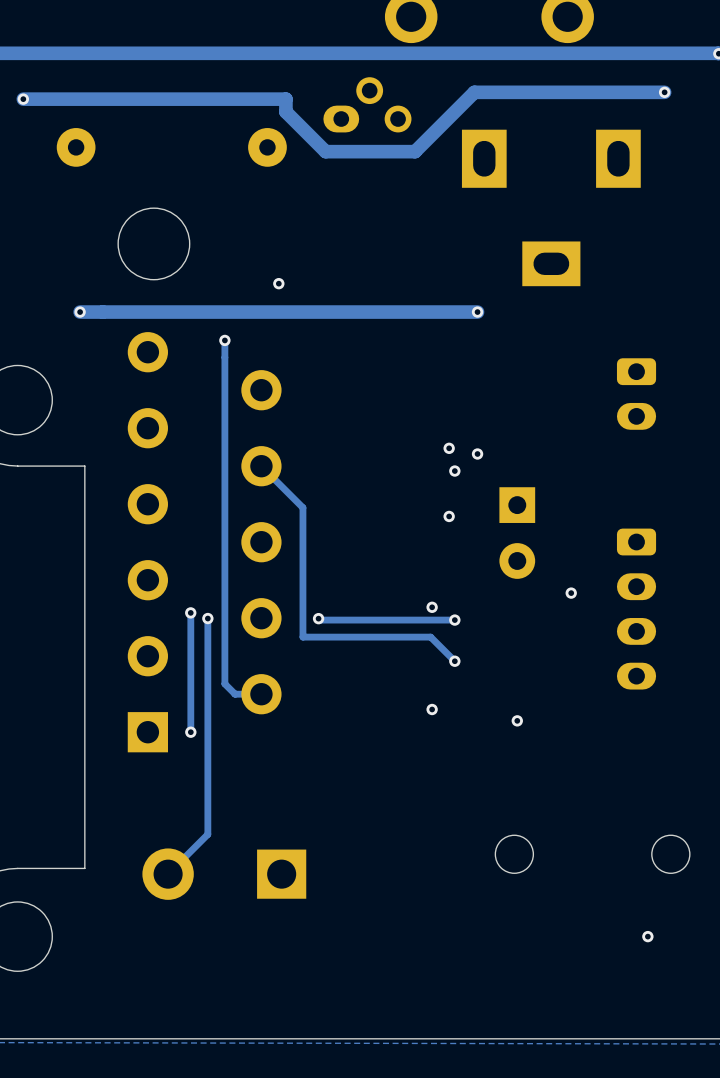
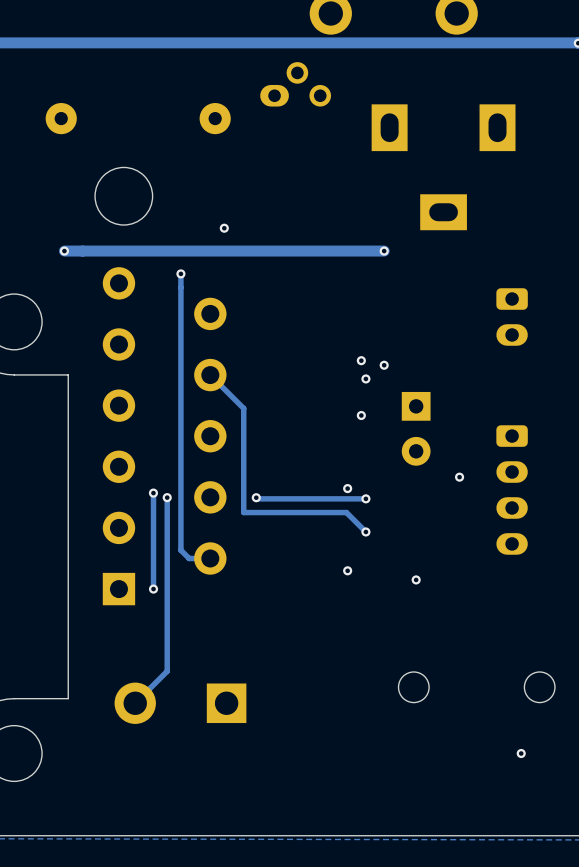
track: (664, 92) (474, 92) (415, 151) (325, 151) (285, 111) (285, 99) (23, 99) -> none
via: (664, 92) -> none
via: (23, 99) -> none

